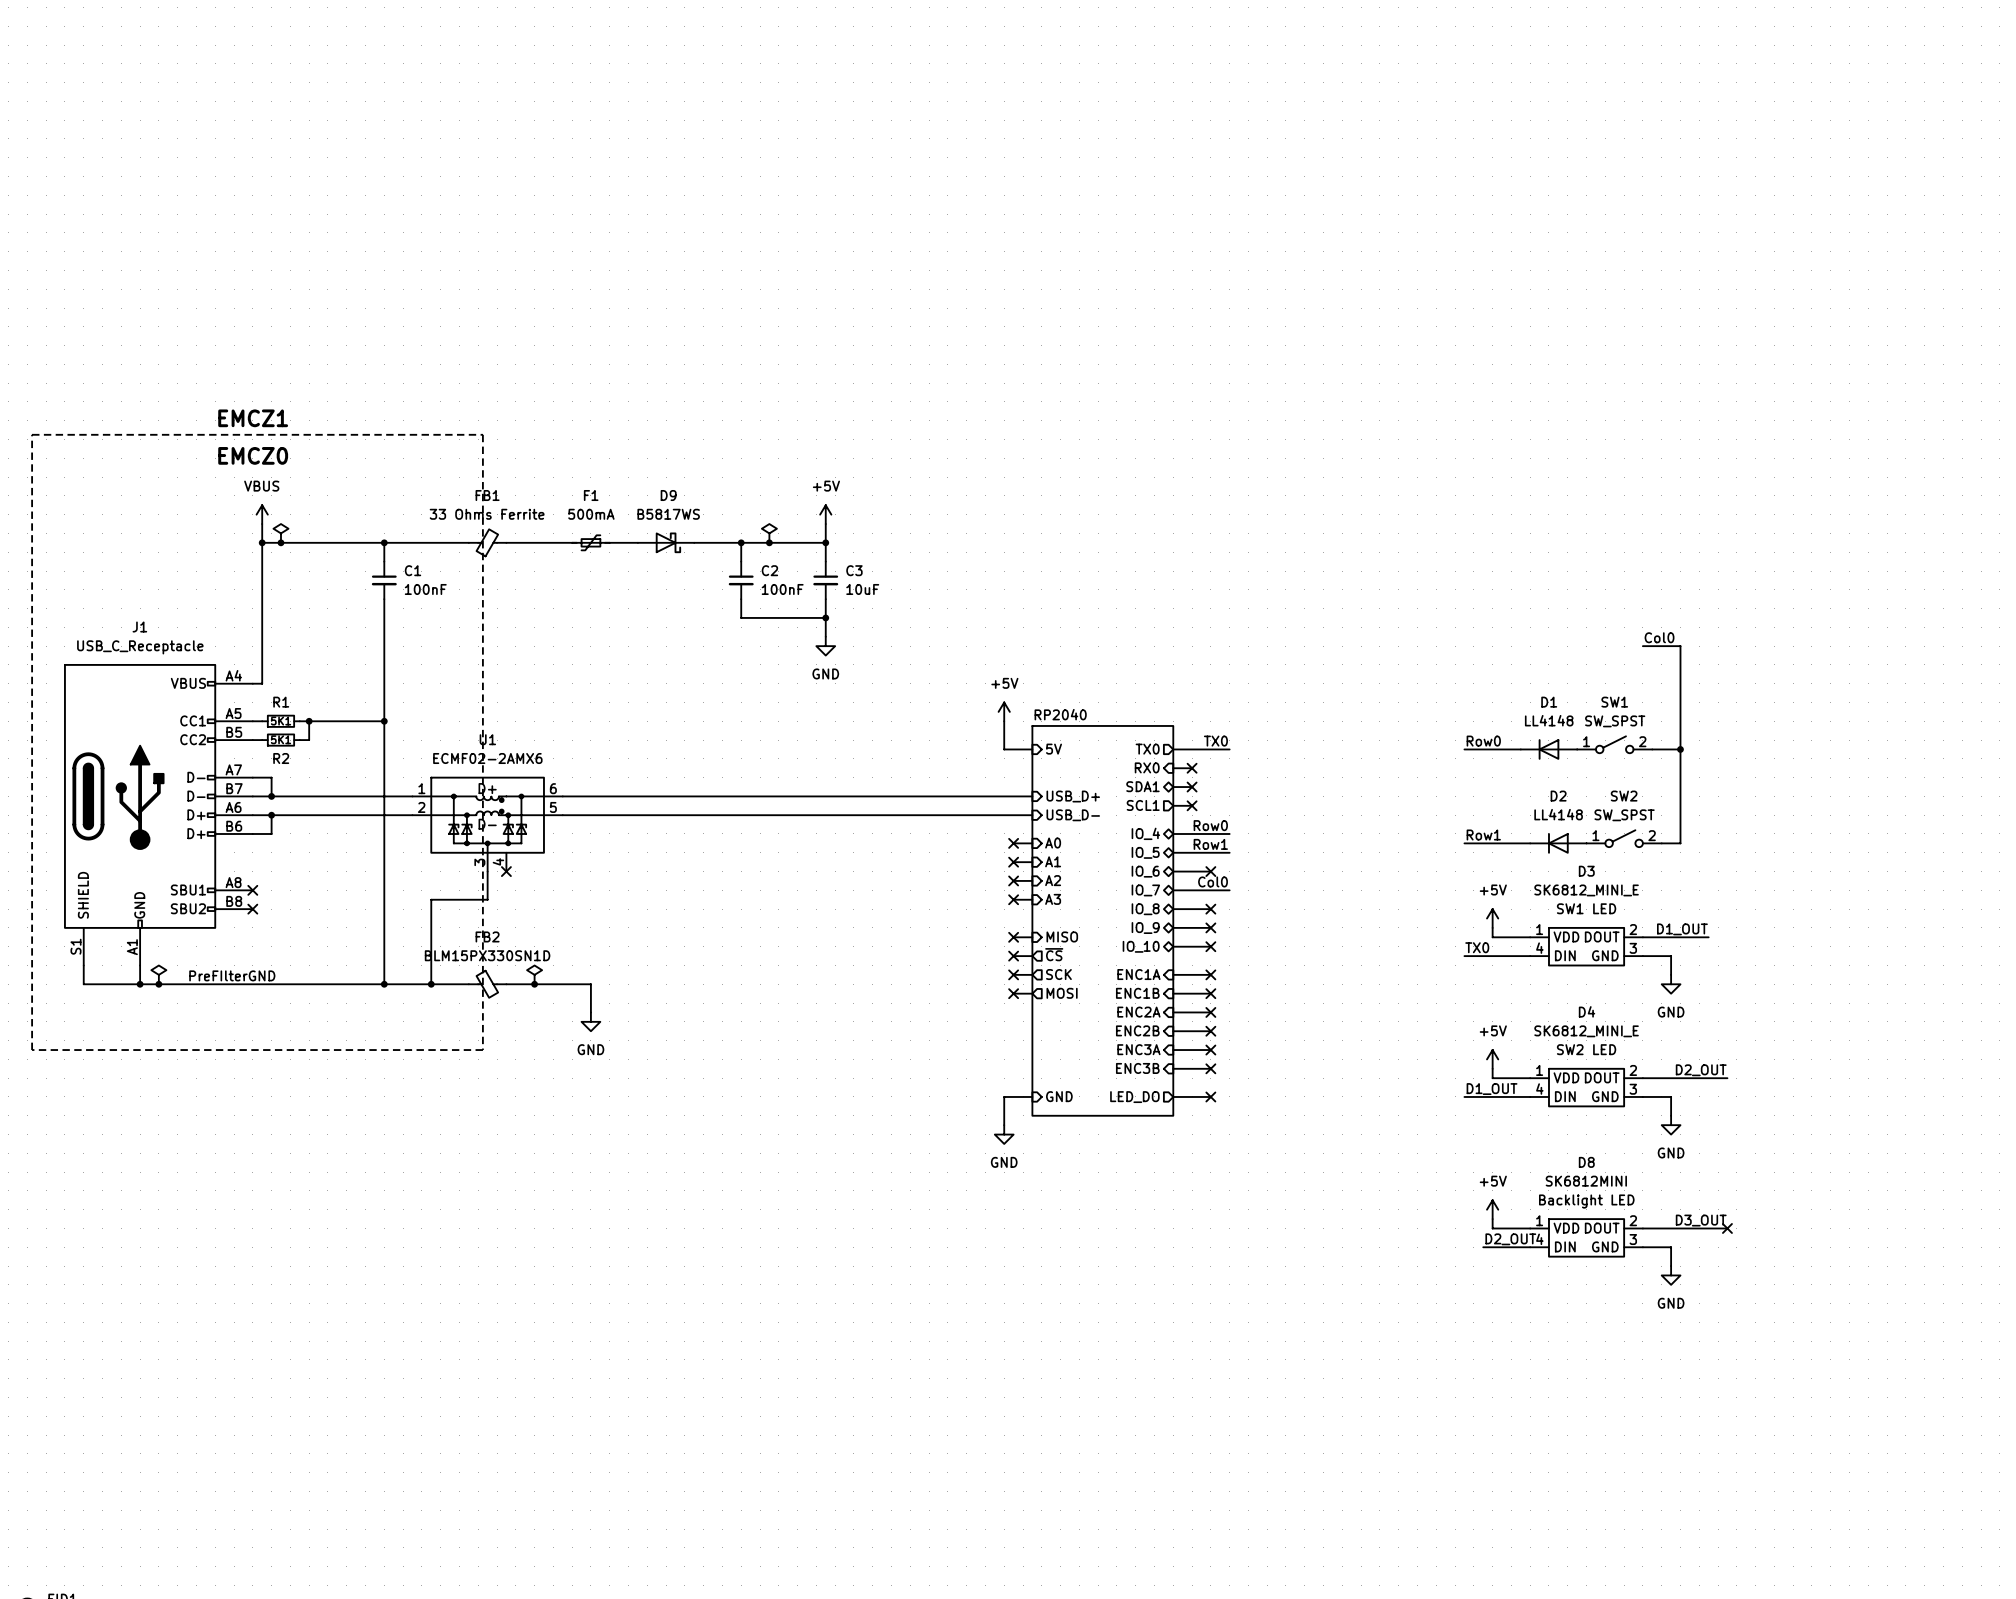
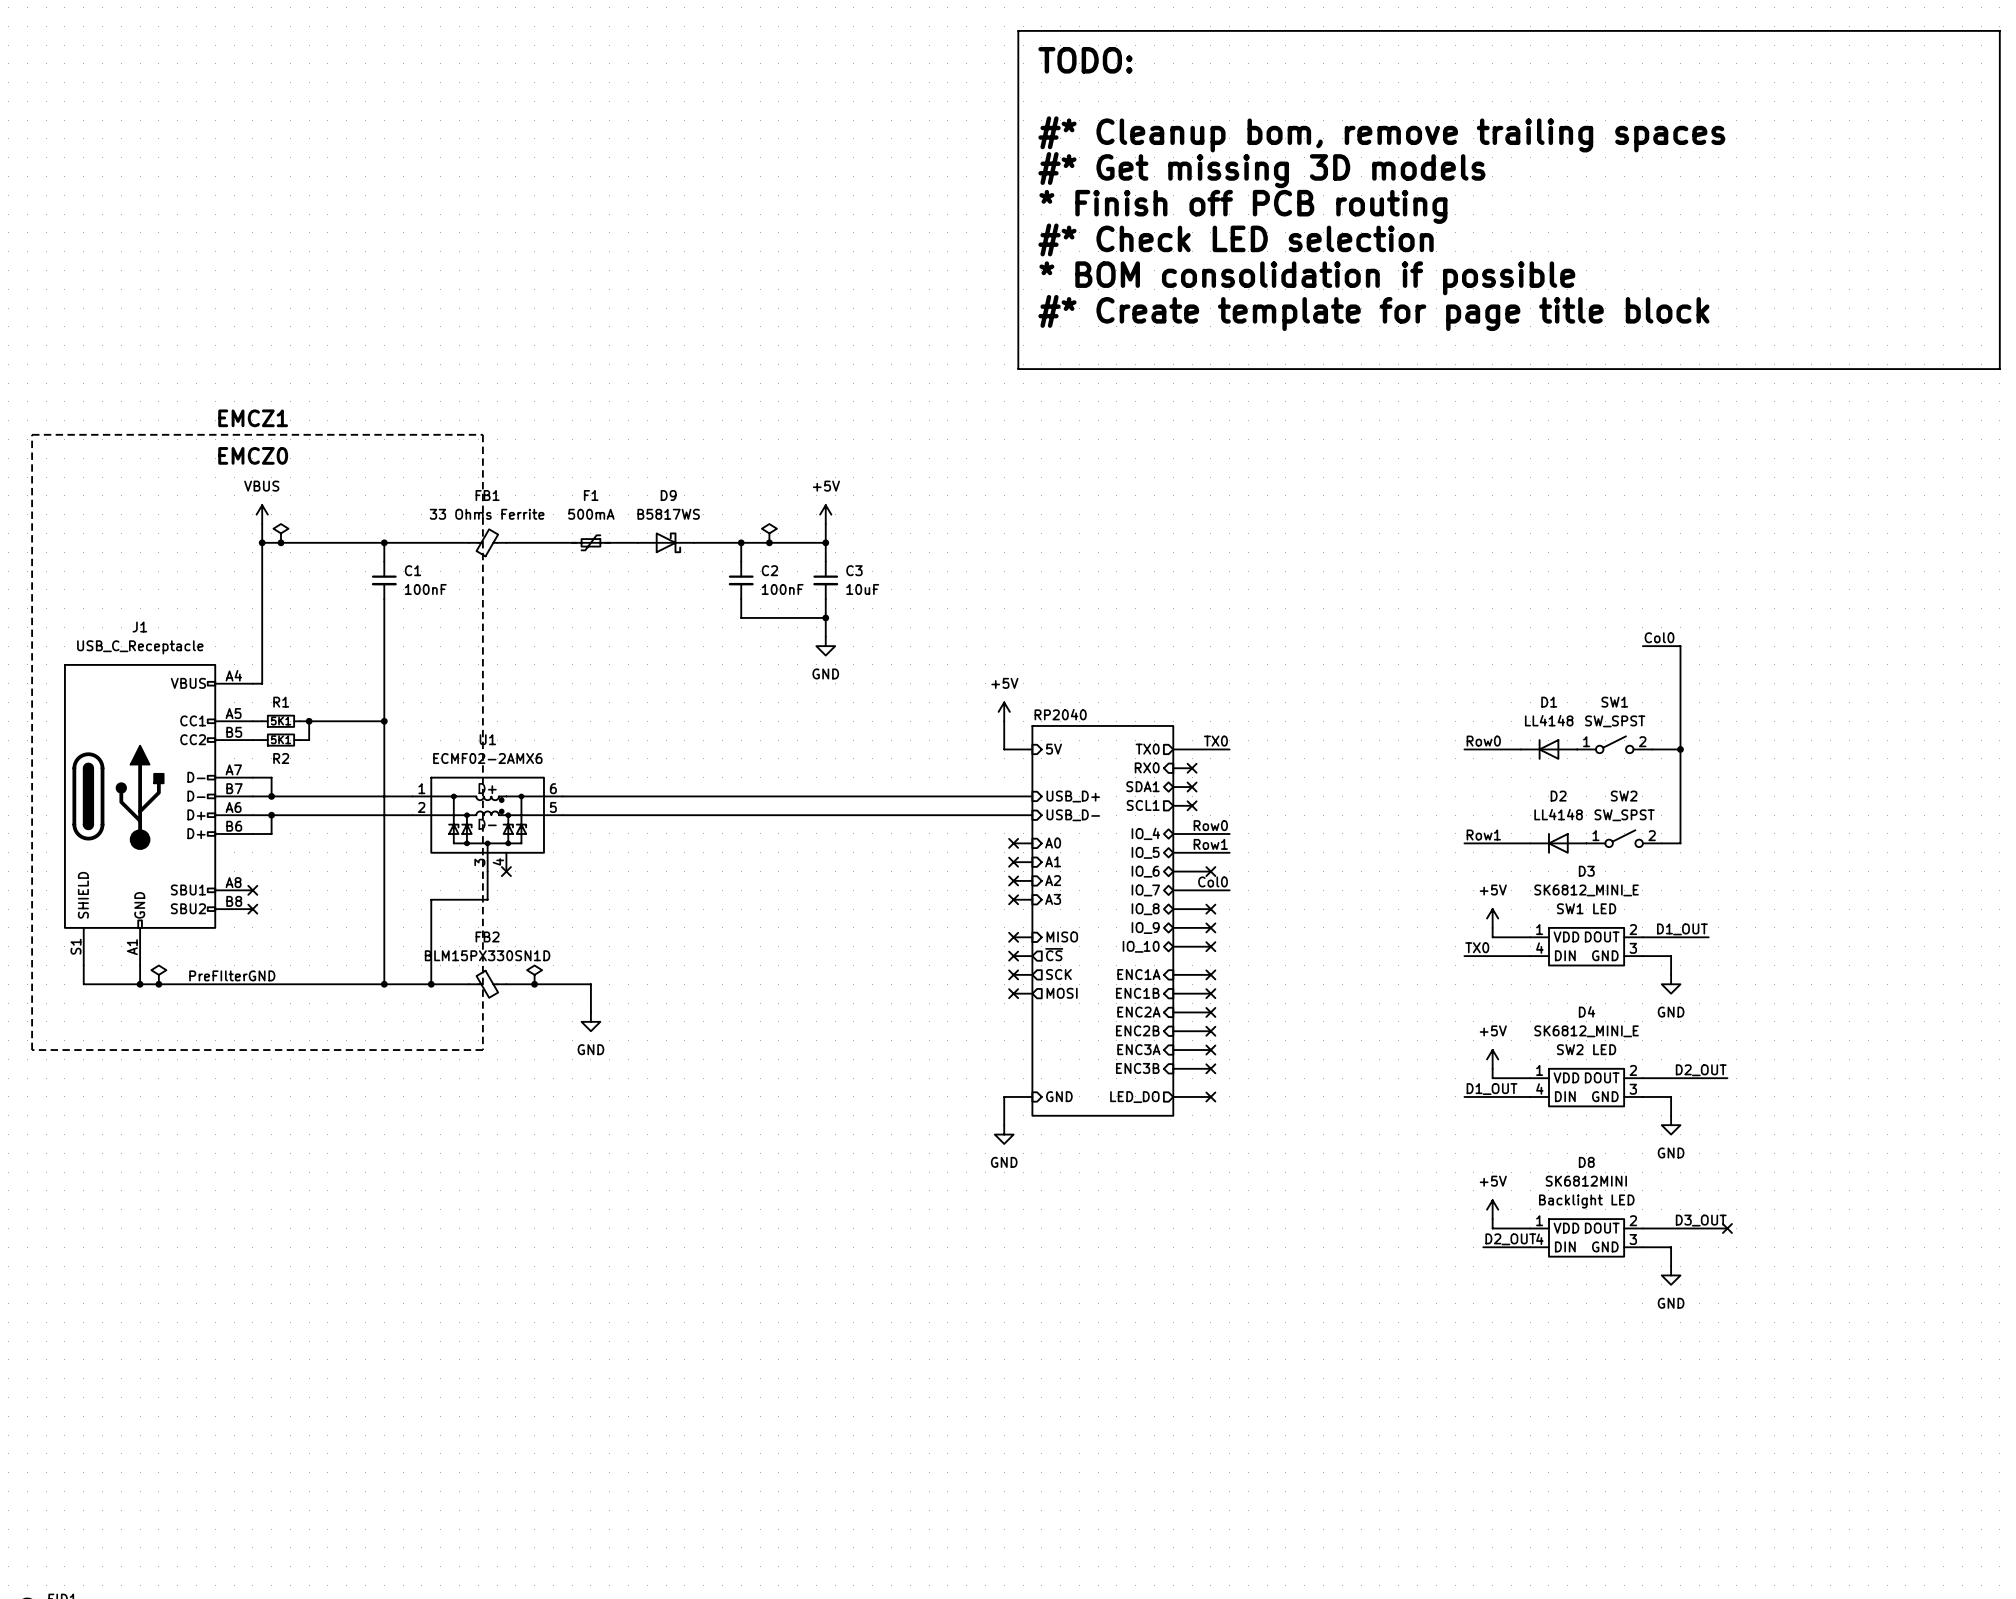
line: none -> (1018, 30) (1999, 30) (1999, 369) (1018, 369) (1018, 30)
text: none -> TODO: (1085, 60)
text: none -> #* Cleanup bom, remove trailing spaces (1381, 134)
text: none -> #* Get missing 3D models (1261, 170)
text: none -> * Finish off PCB routing (1243, 206)
text: none -> #* Check LED selection (1236, 239)
text: none -> * BOM consolidation if possible (1307, 278)
text: none -> #* Create template for page title block (1373, 312)

